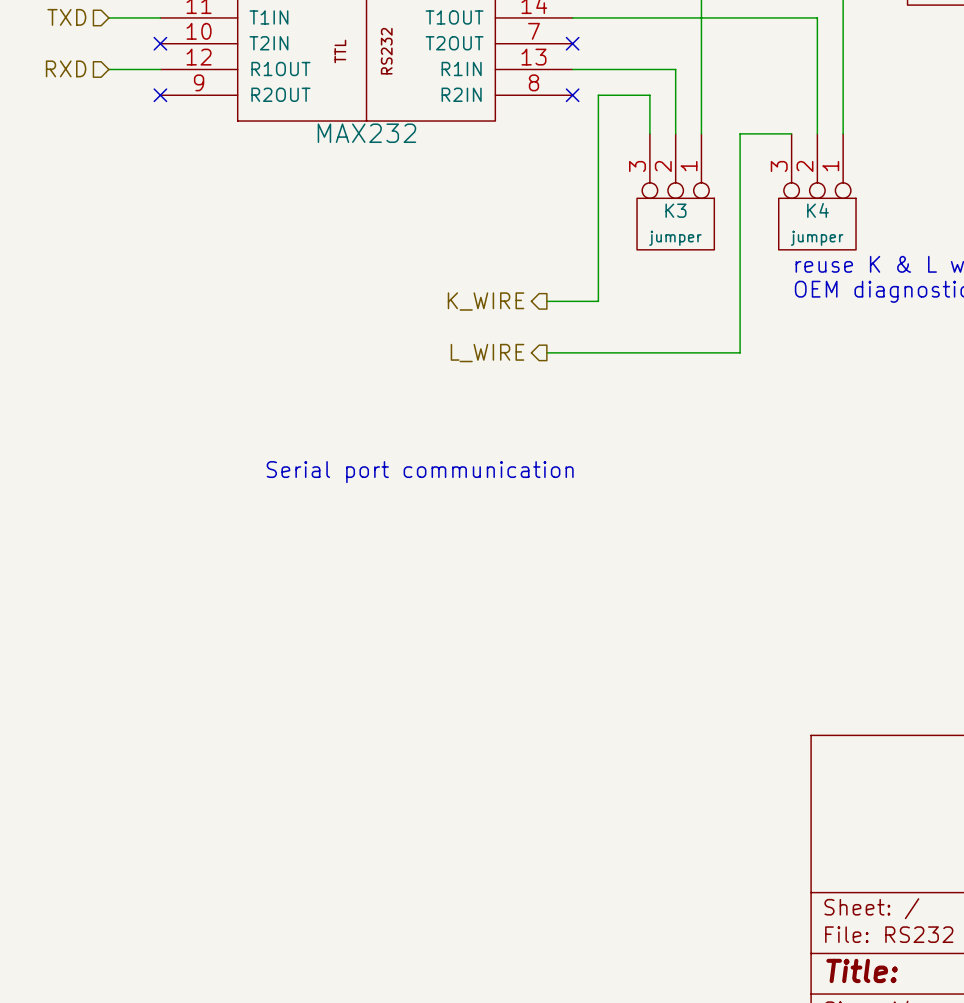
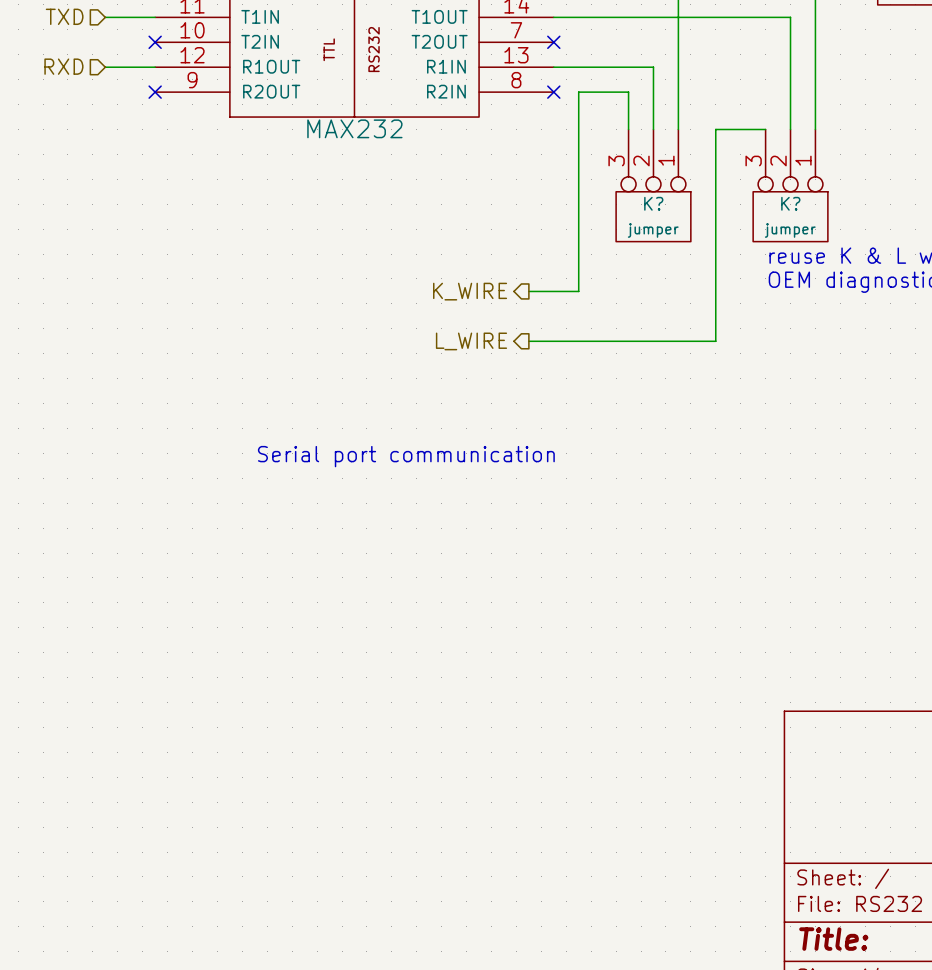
K3 name: K3 (675, 210) -> K? (653, 203)
K4 name: K4 (817, 210) -> K? (790, 203)

